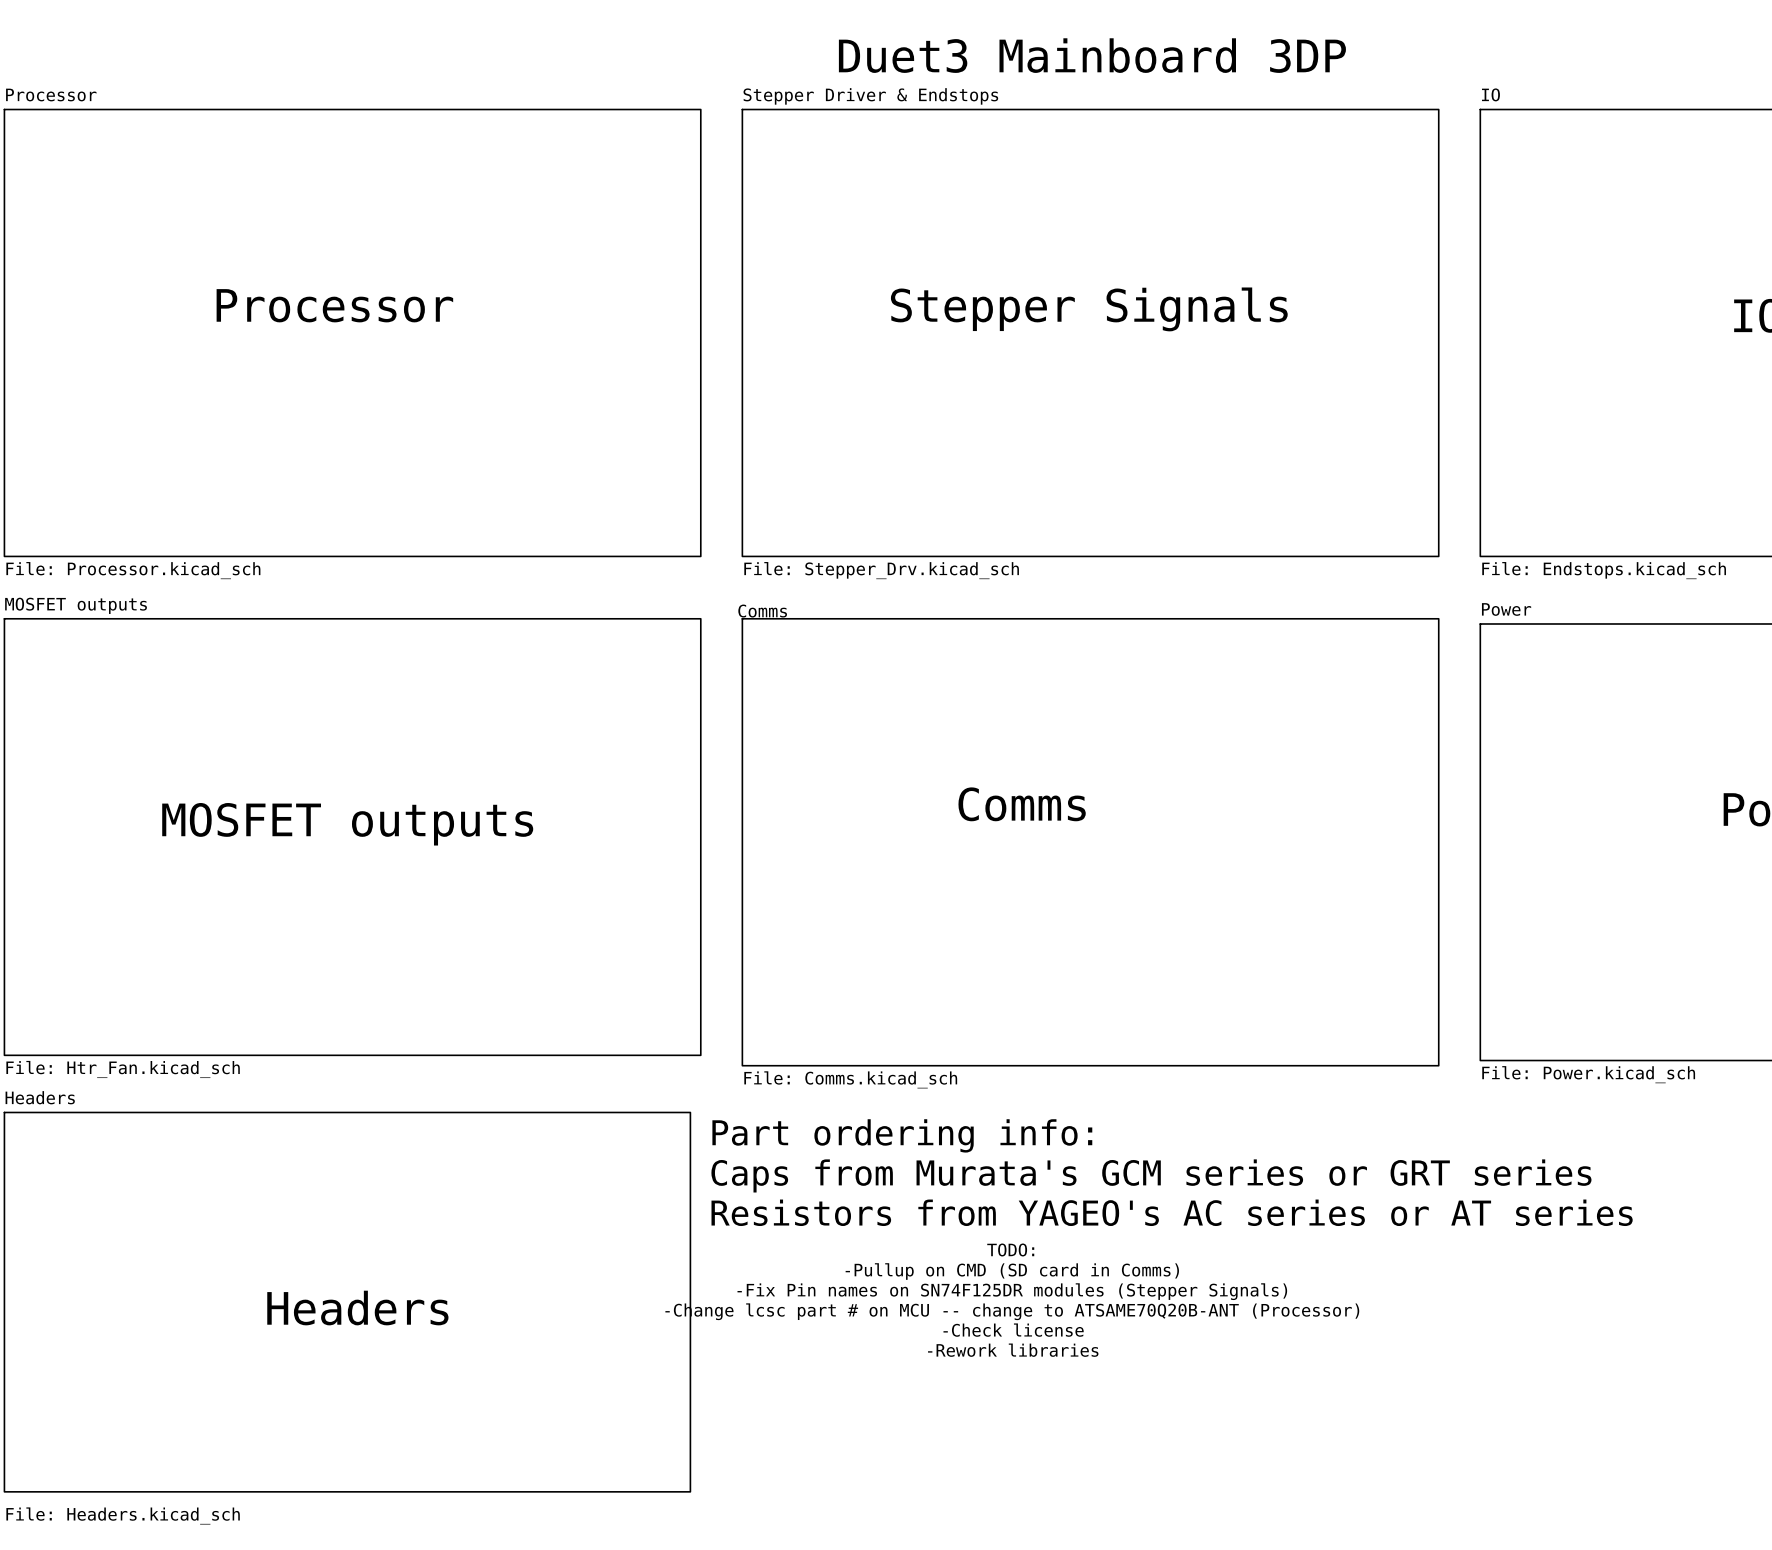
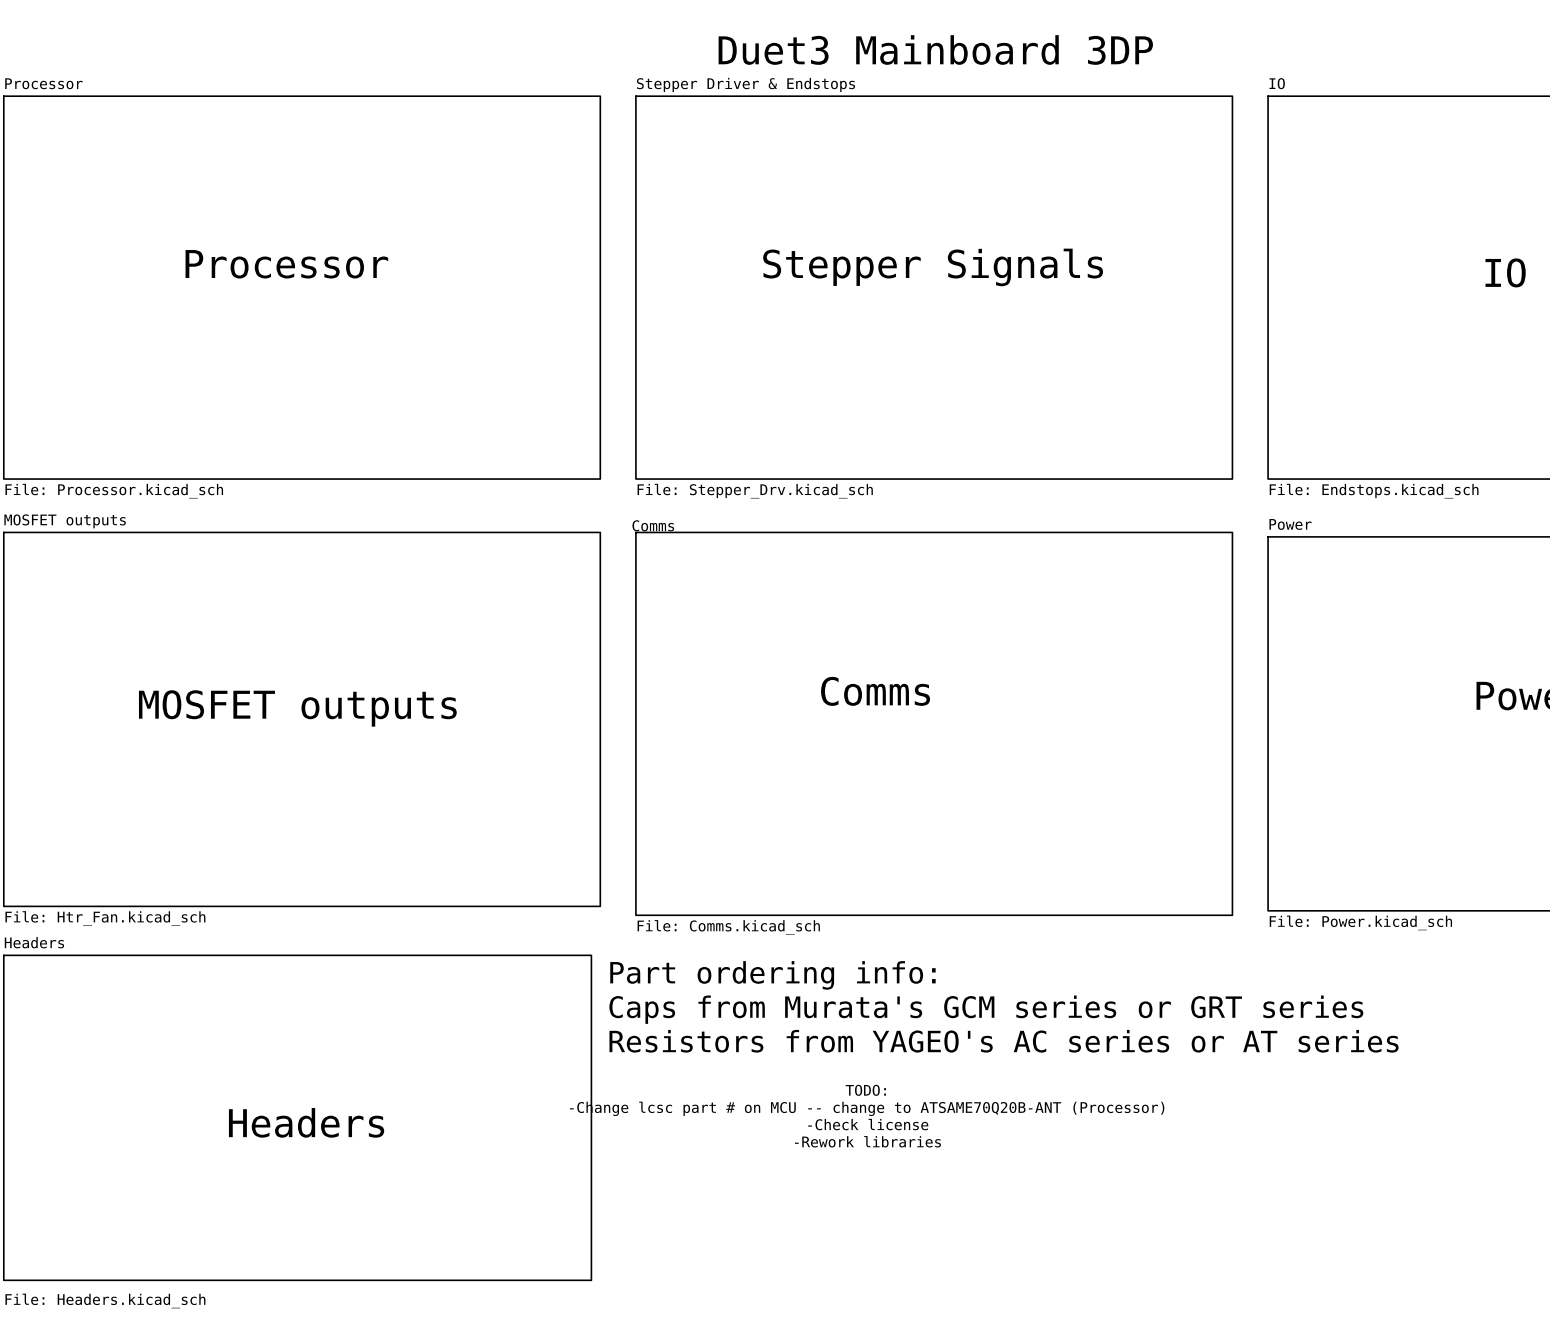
text: TODO: (1010, 1249) -> none
text: -Pullup on CMD (SD card in Comms) (1012, 1271) -> TODO: (865, 1090)
text: -Fix Pin names on SN74F125DR modules (Stepper Signals) (1012, 1291) -> -Change lcsc part # on MCU -- change to ATSAME70Q20B-ANT (Processor) (867, 1108)
text: -Change lcsc part # on MCU -- change to ATSAME70Q20B-ANT (Processor) (1012, 1311) -> -Check license (868, 1124)
text: -Check license (1013, 1330) -> -Rework libraries (867, 1141)
text: -Rework libraries (1013, 1350) -> none

